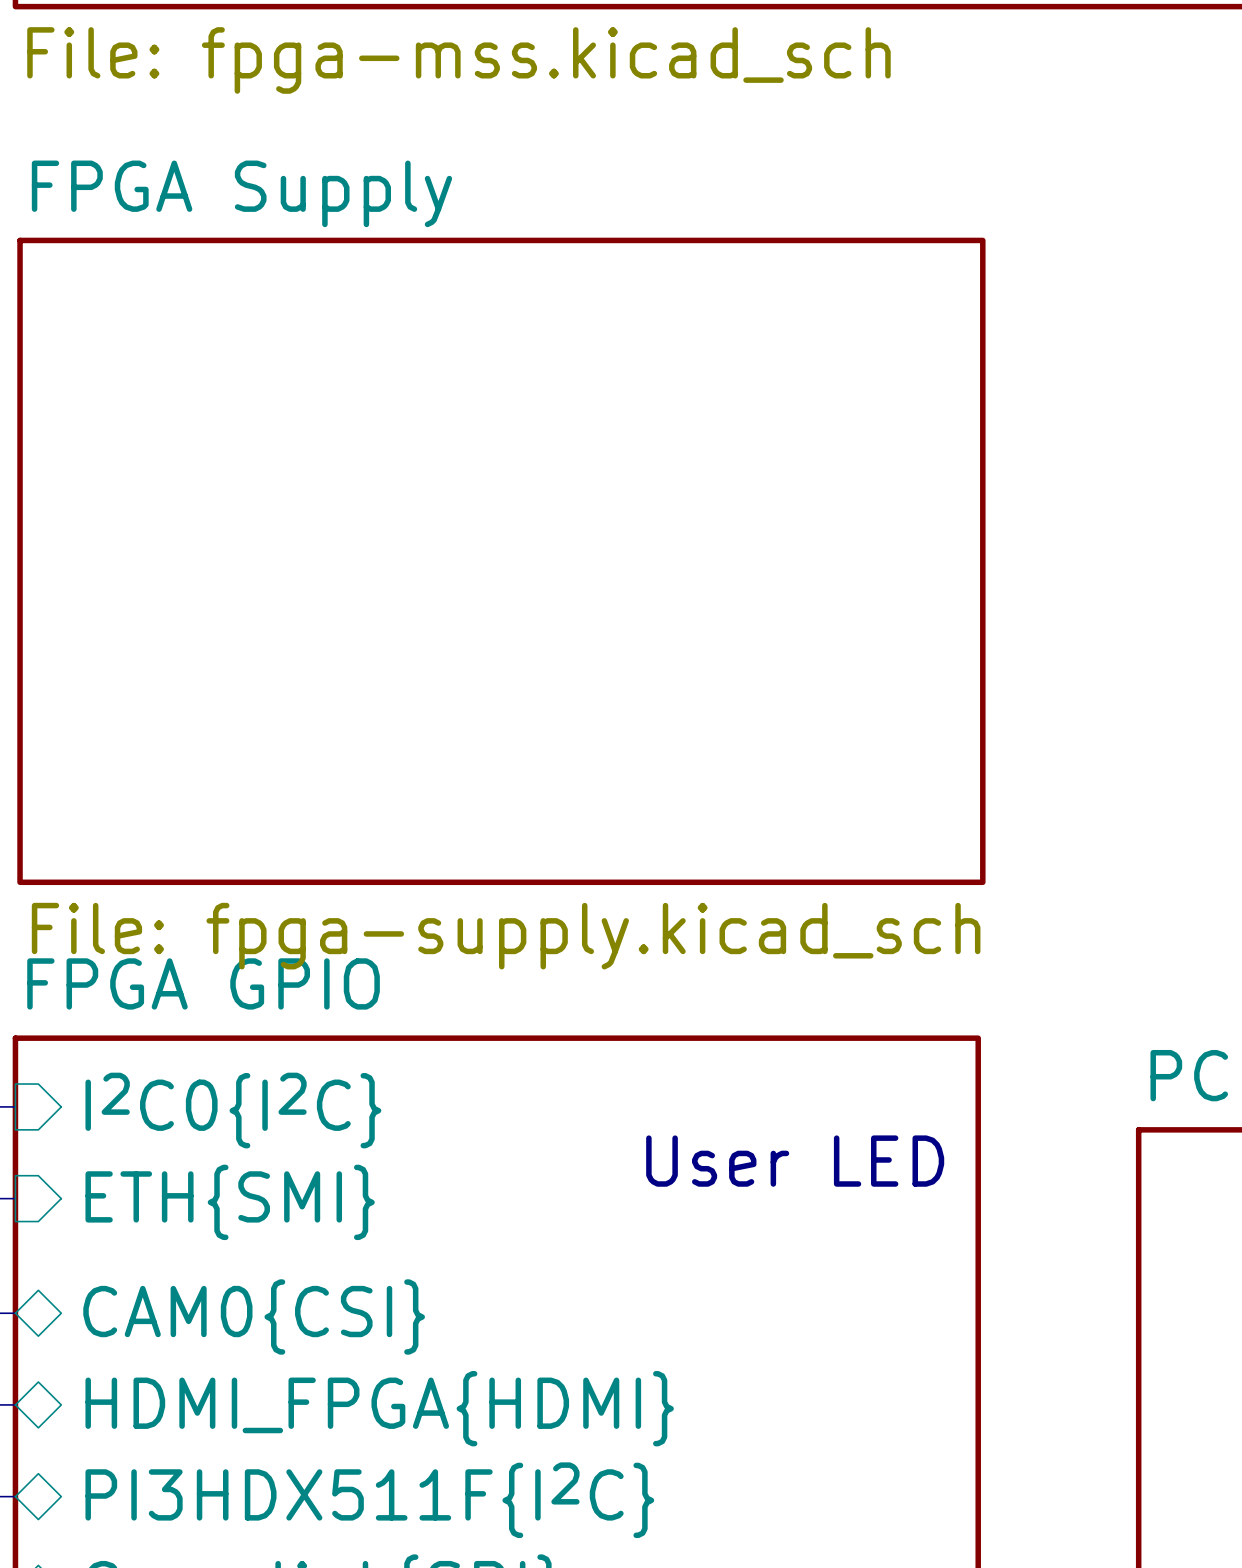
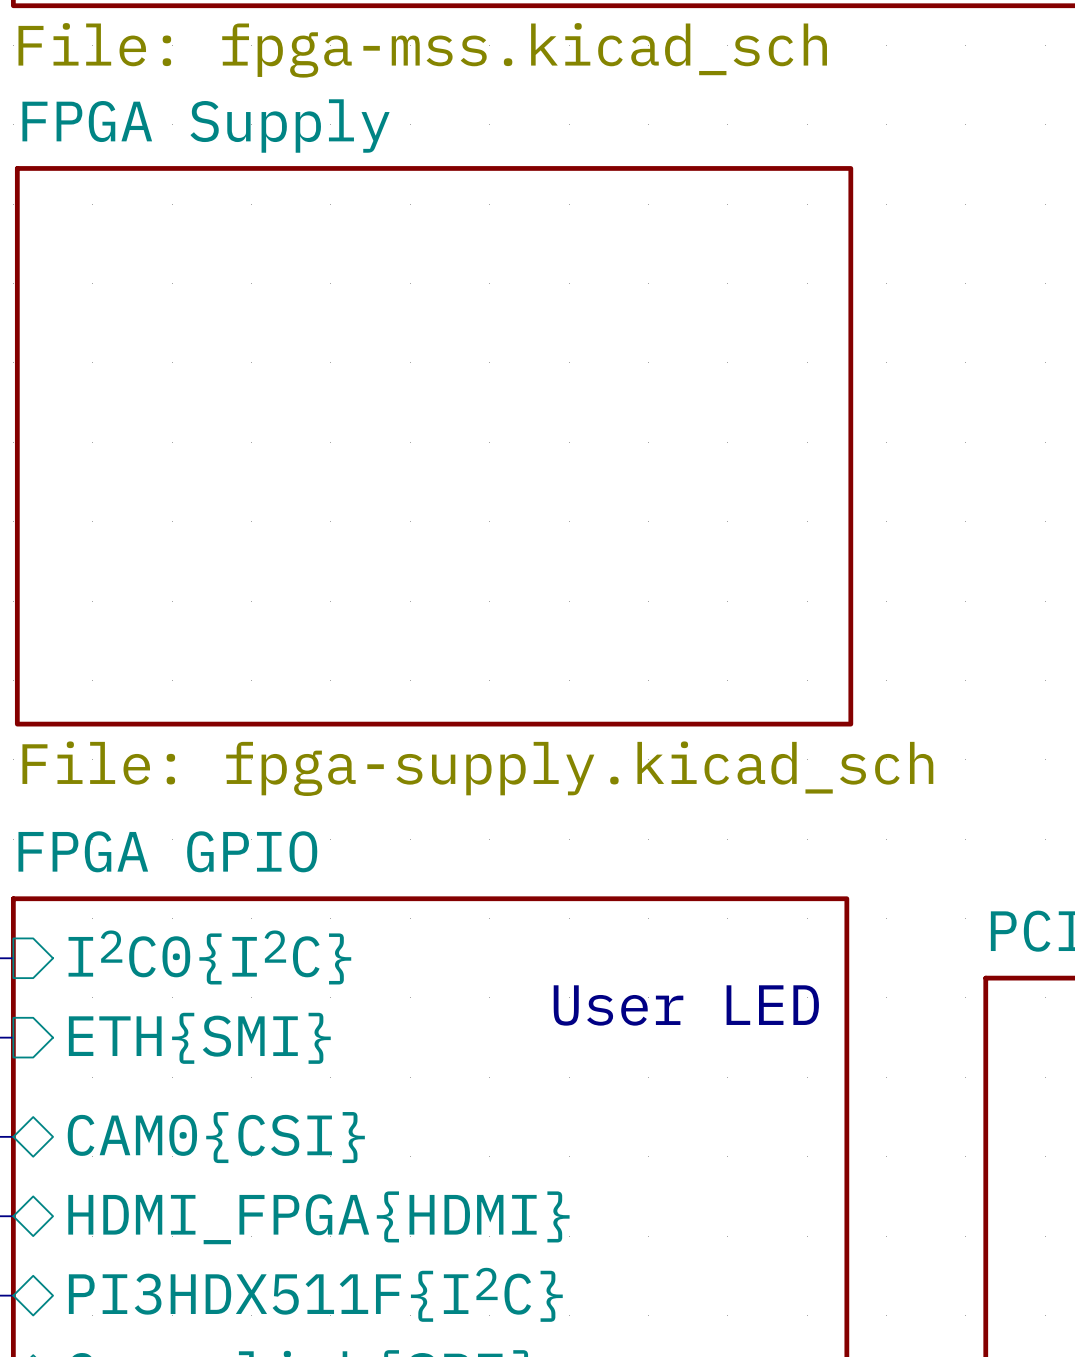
sheet FPGA Supply position: (501, 561) -> (434, 446)

